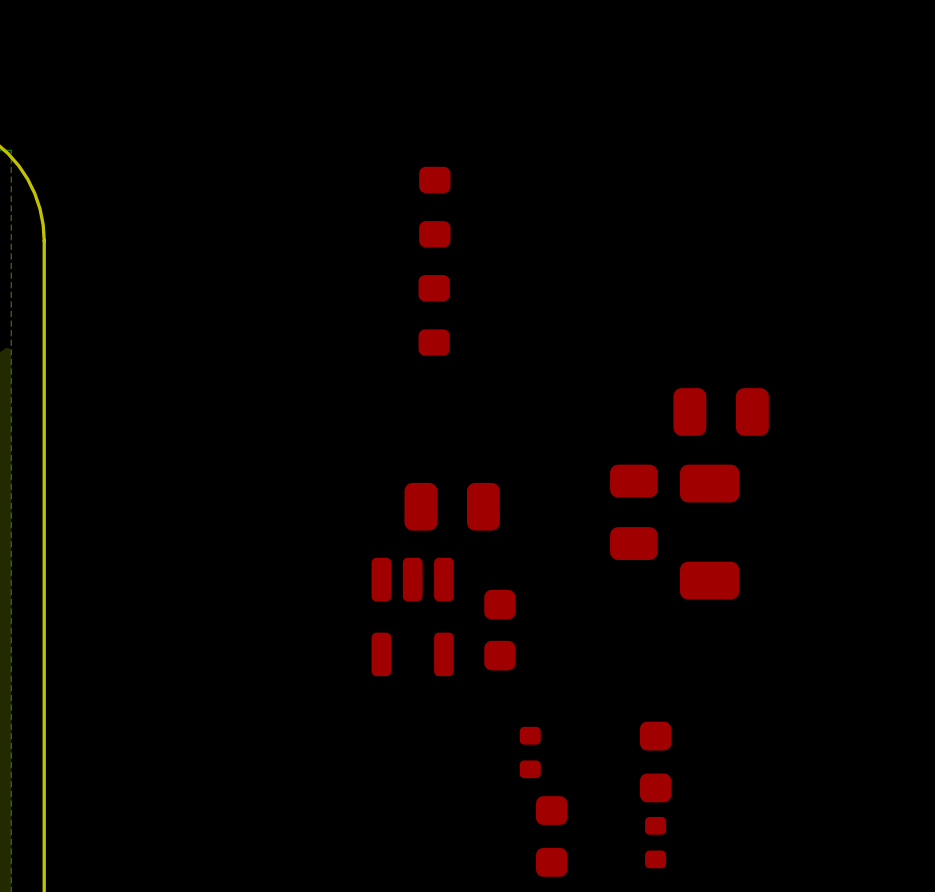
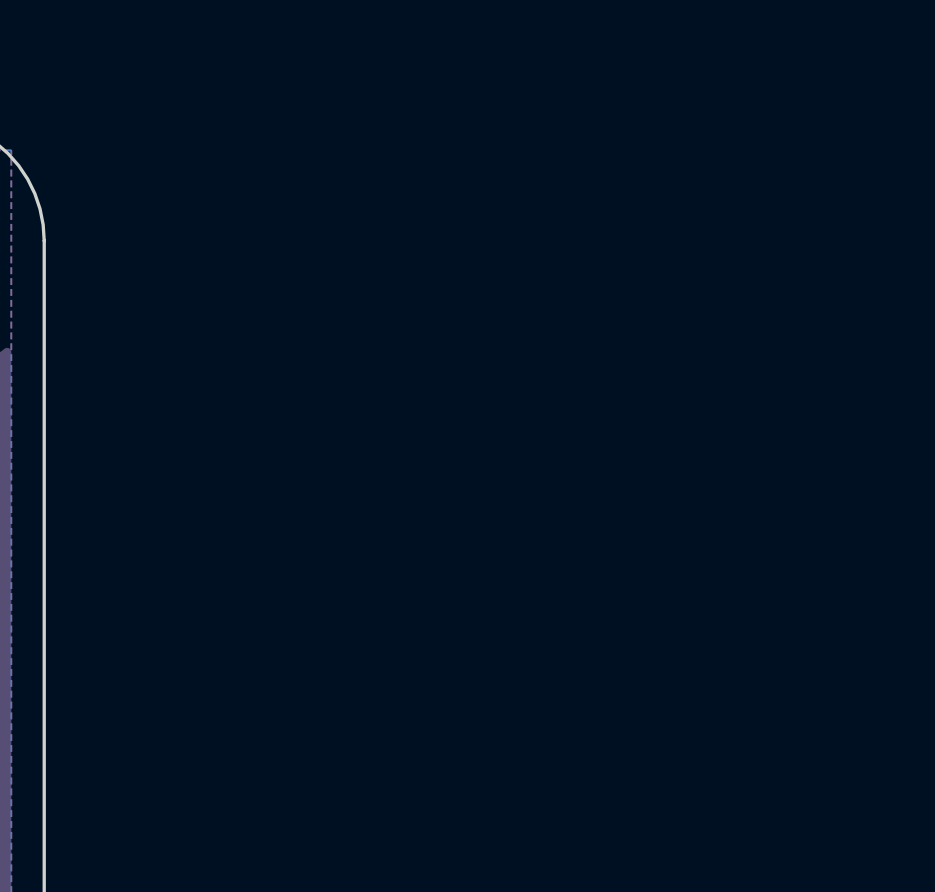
part: (434, 207) -> none
part: (434, 315) -> none
part: (721, 411) -> none
part: (452, 506) -> none
part: (633, 512) -> none
part: (709, 532) -> none
part: (412, 616) -> none
part: (499, 630) -> none
part: (530, 752) -> none
part: (655, 761) -> none
part: (551, 836) -> none
part: (655, 842) -> none

